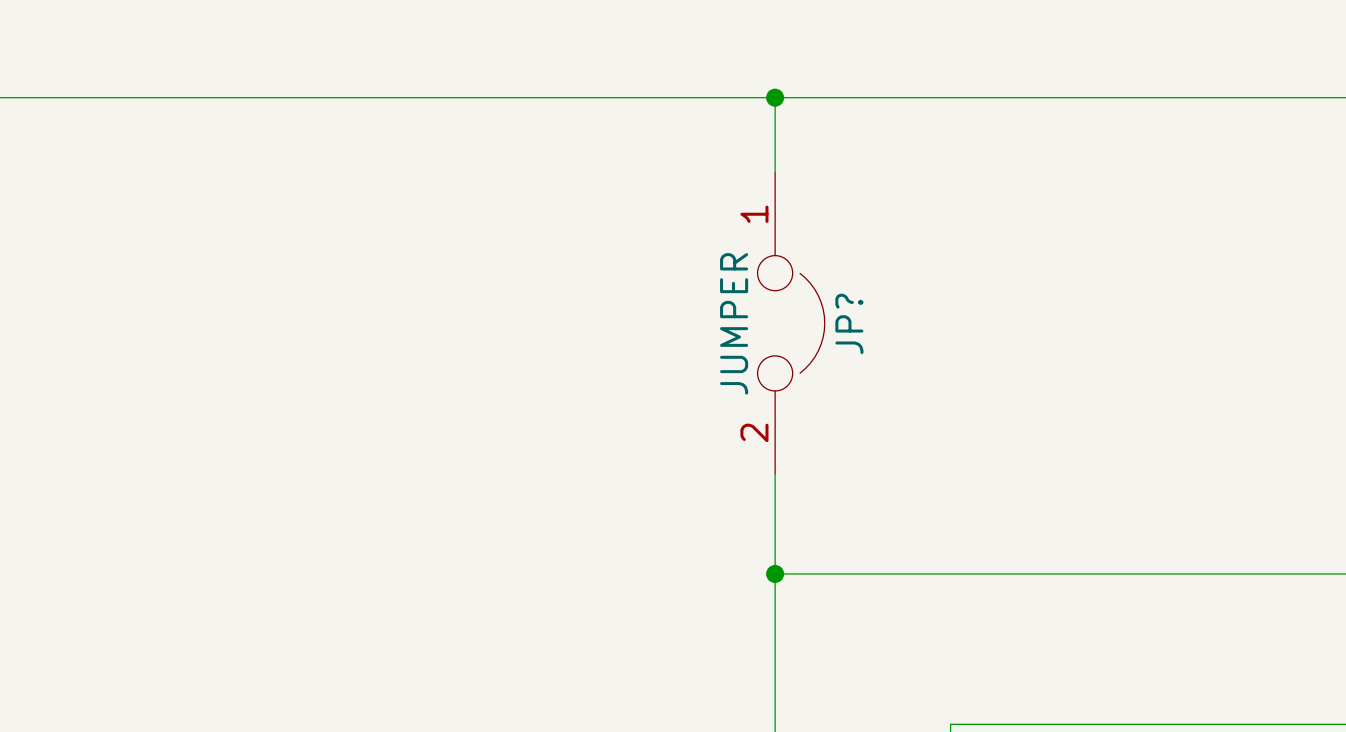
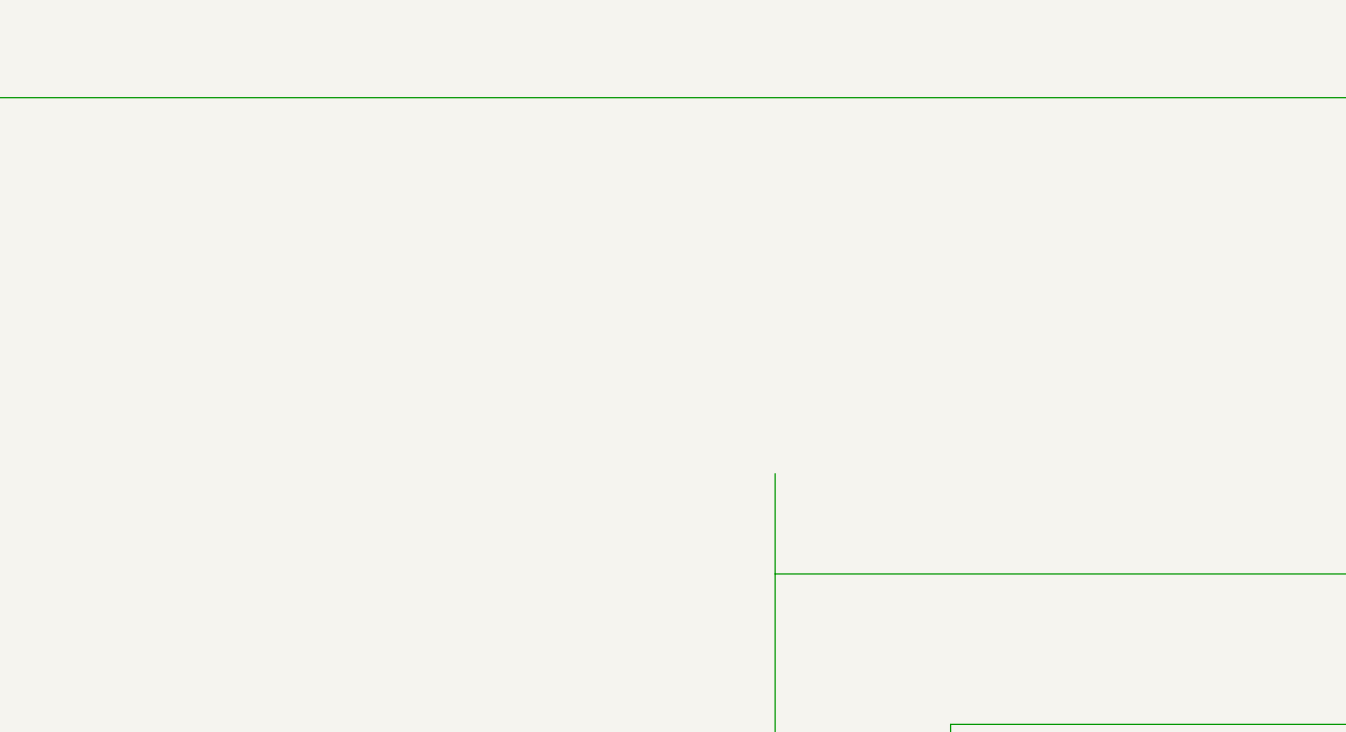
wire: (775, 97) (775, 172) -> none
junction: (775, 97) -> none
JP?: JUMPER (791, 323) -> none
junction: (775, 573) -> none

